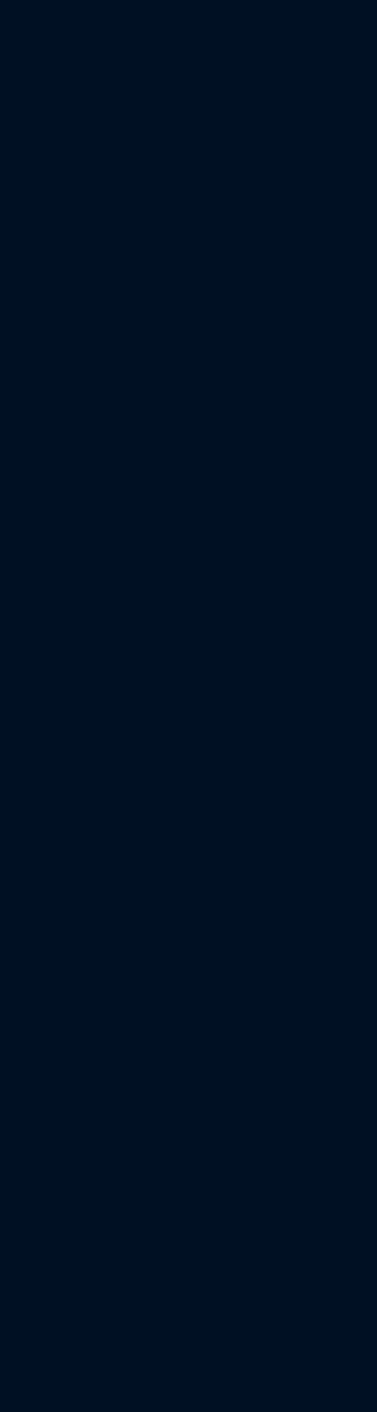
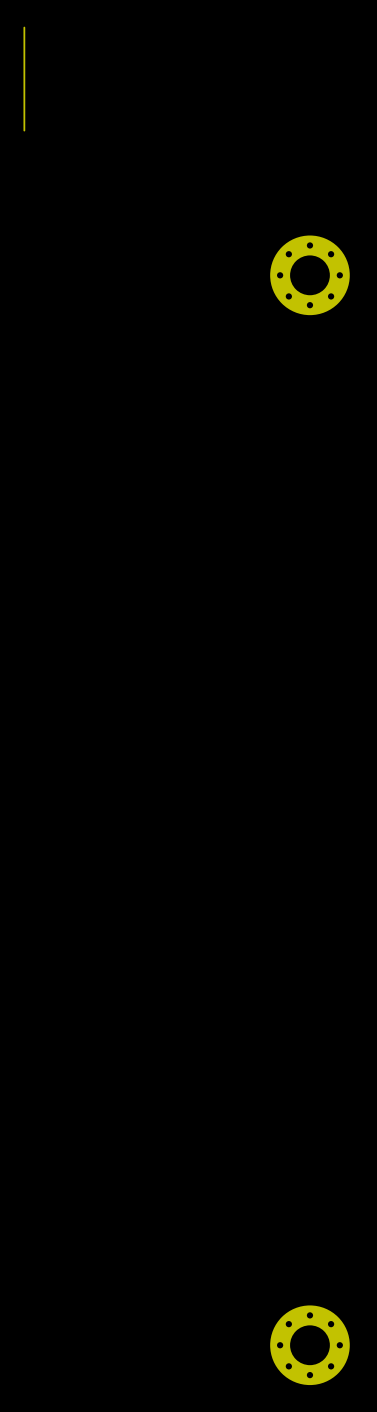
board edge: none -> (24, 27) (24, 130)
part: none -> (309, 275)
part: none -> (309, 1345)

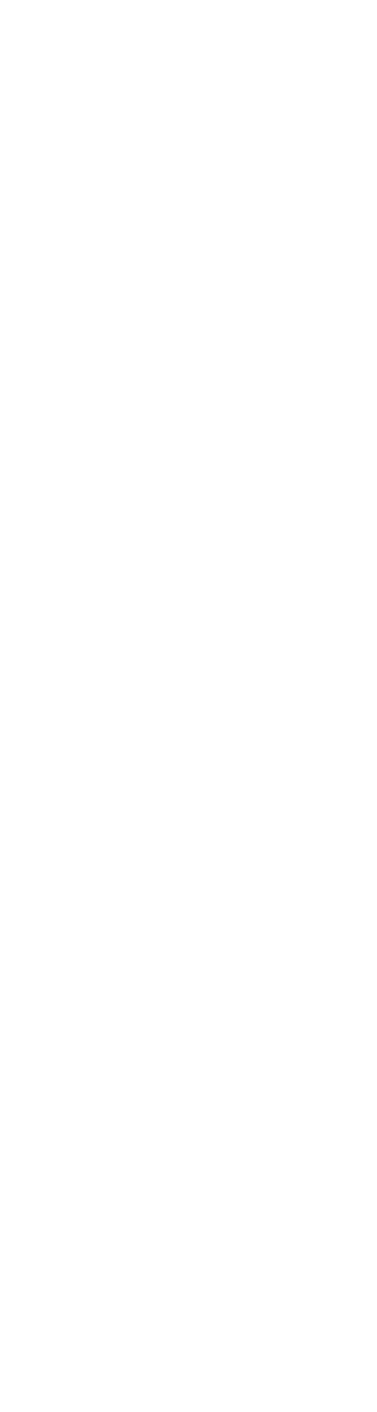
board edge: (24, 27) (24, 130) -> none
part: (309, 275) -> none
part: (309, 1345) -> none

